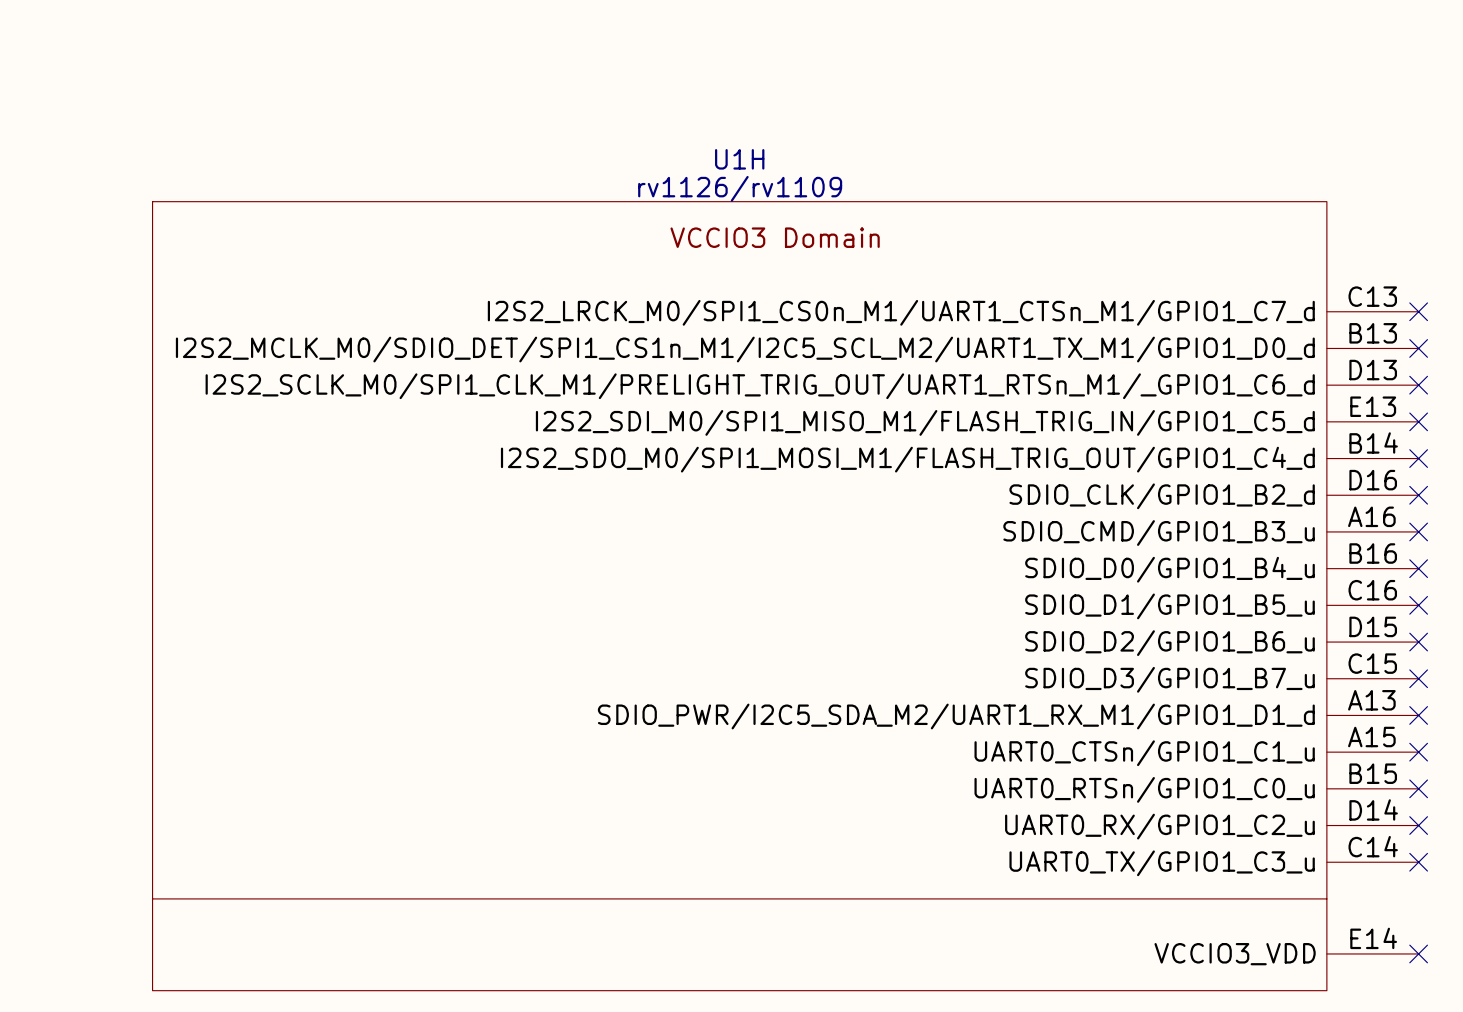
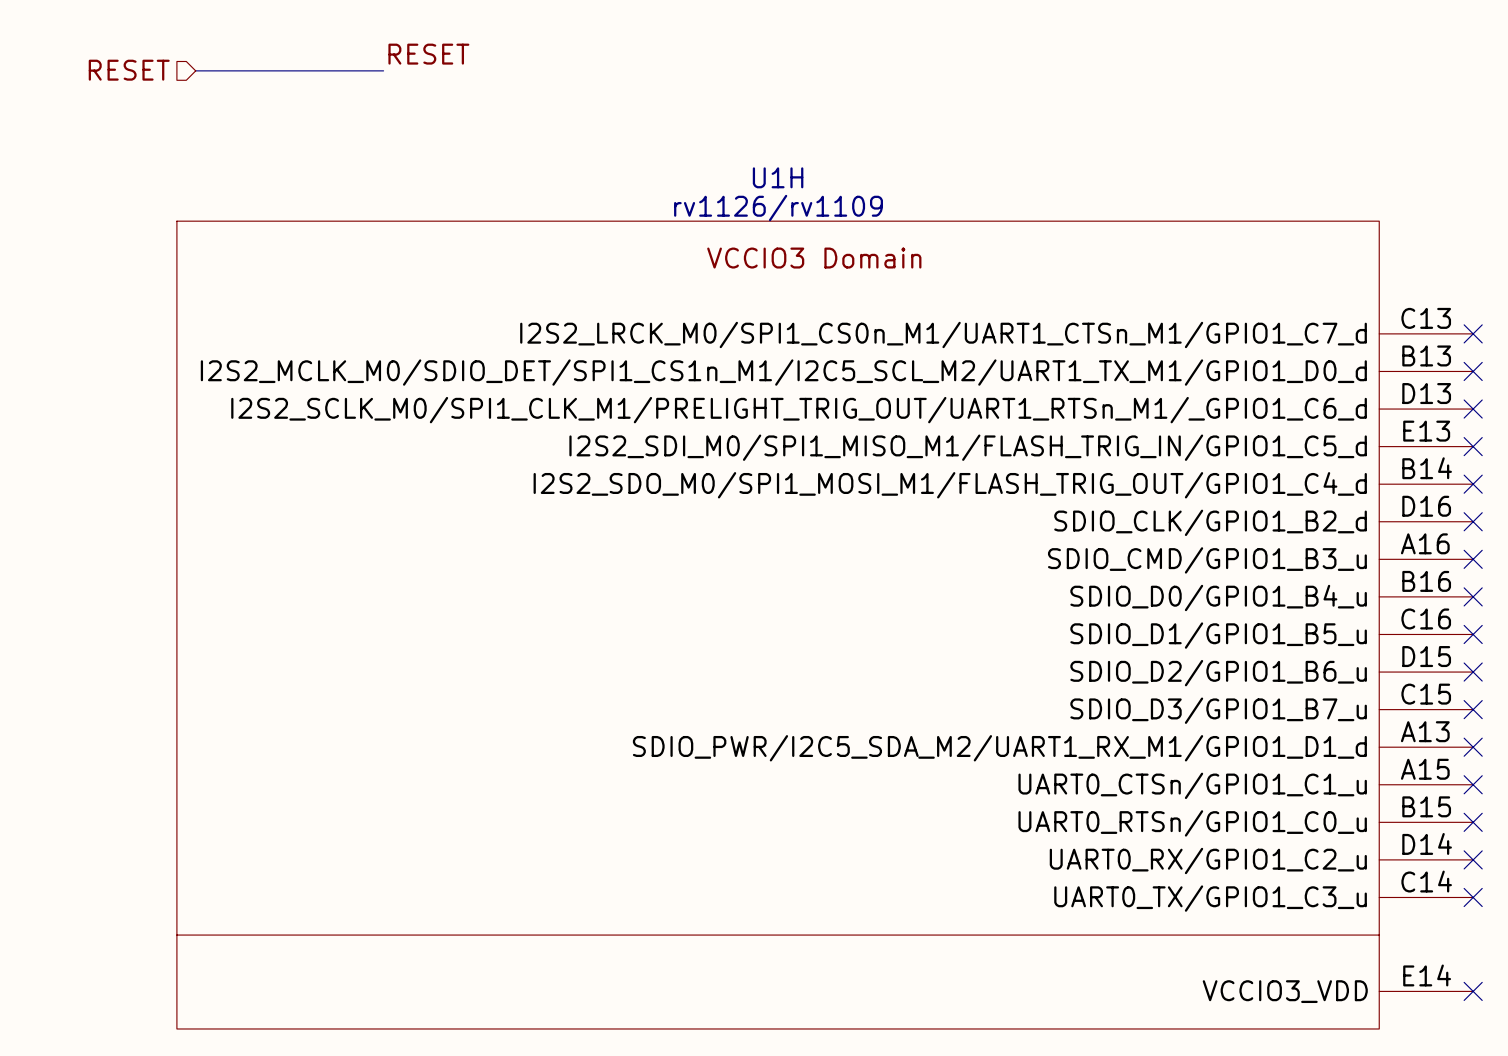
label: none -> RESET (428, 54)
hierarchical label: none -> RESET (129, 70)
wire: none -> (195, 70) (383, 70)

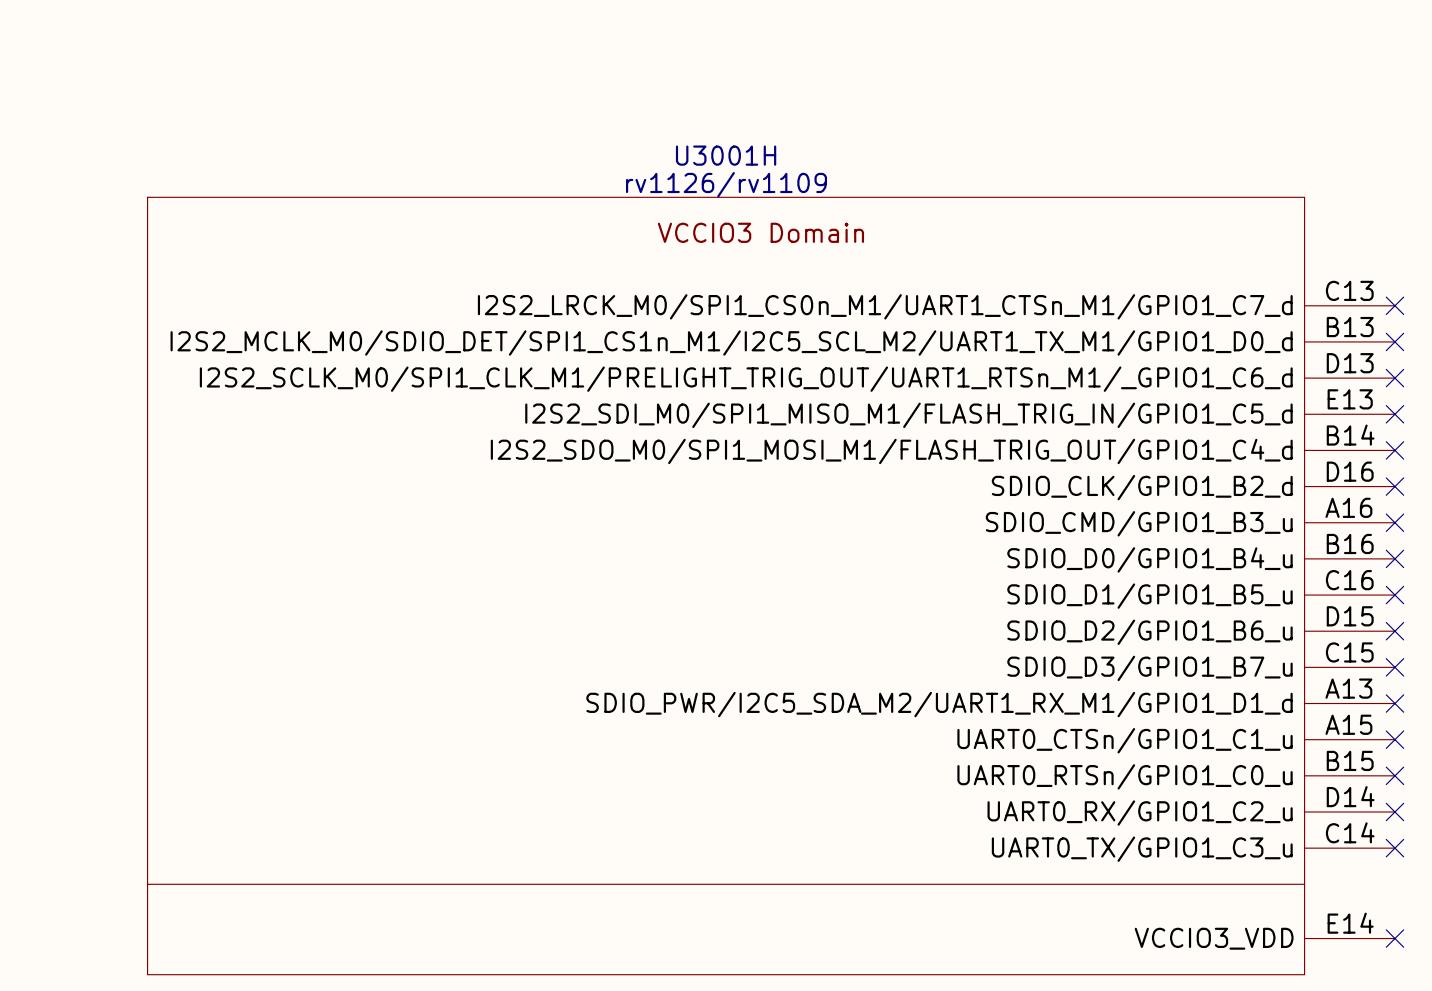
label: RESET (428, 54) -> none
hierarchical label: RESET (129, 70) -> none
wire: (195, 70) (383, 70) -> none
U1H name: U1H (778, 177) -> U3001H (726, 155)

